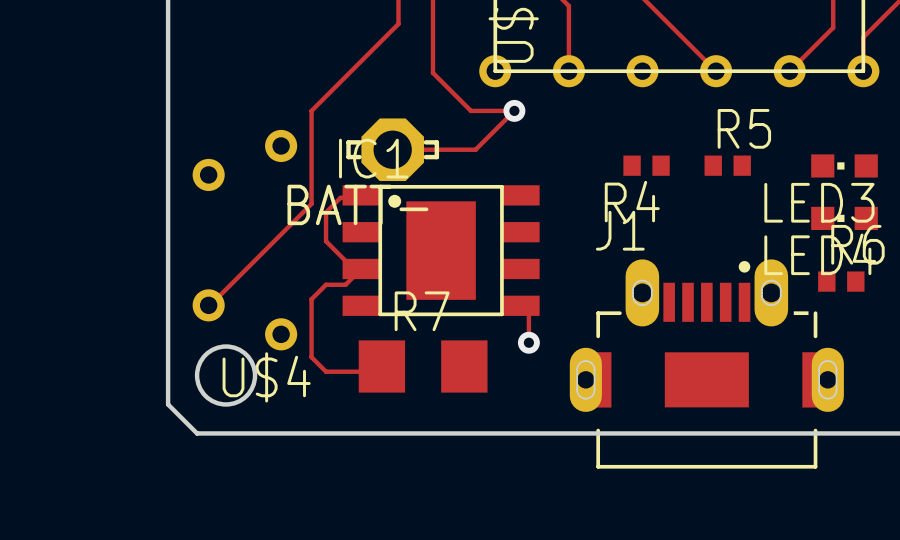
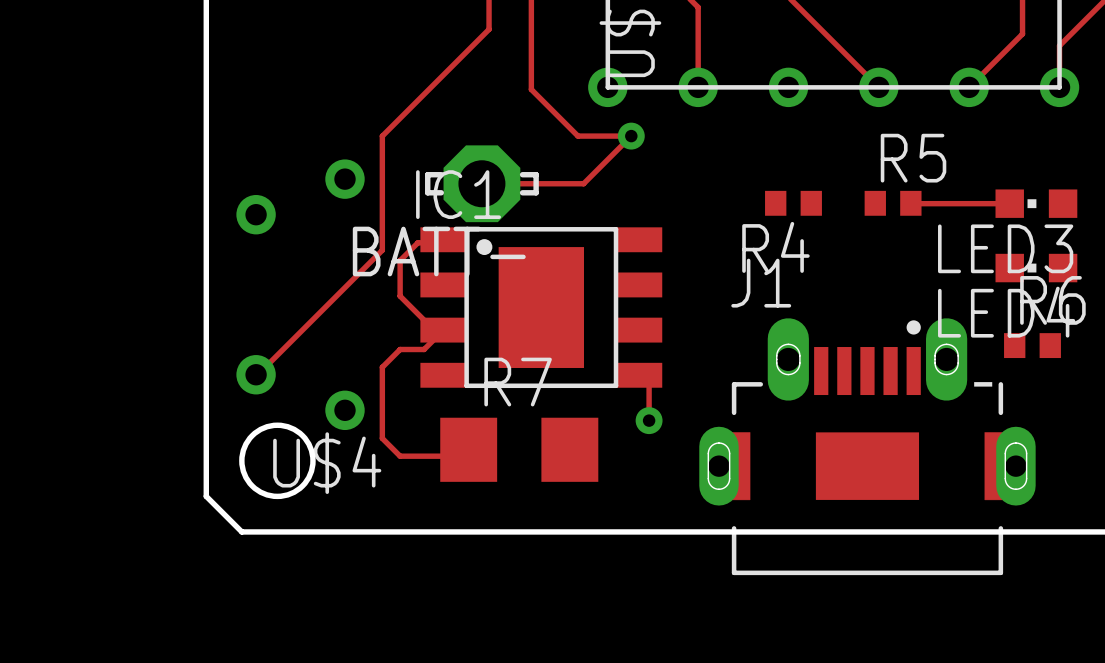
track: none -> (911, 203) (1009, 203)

